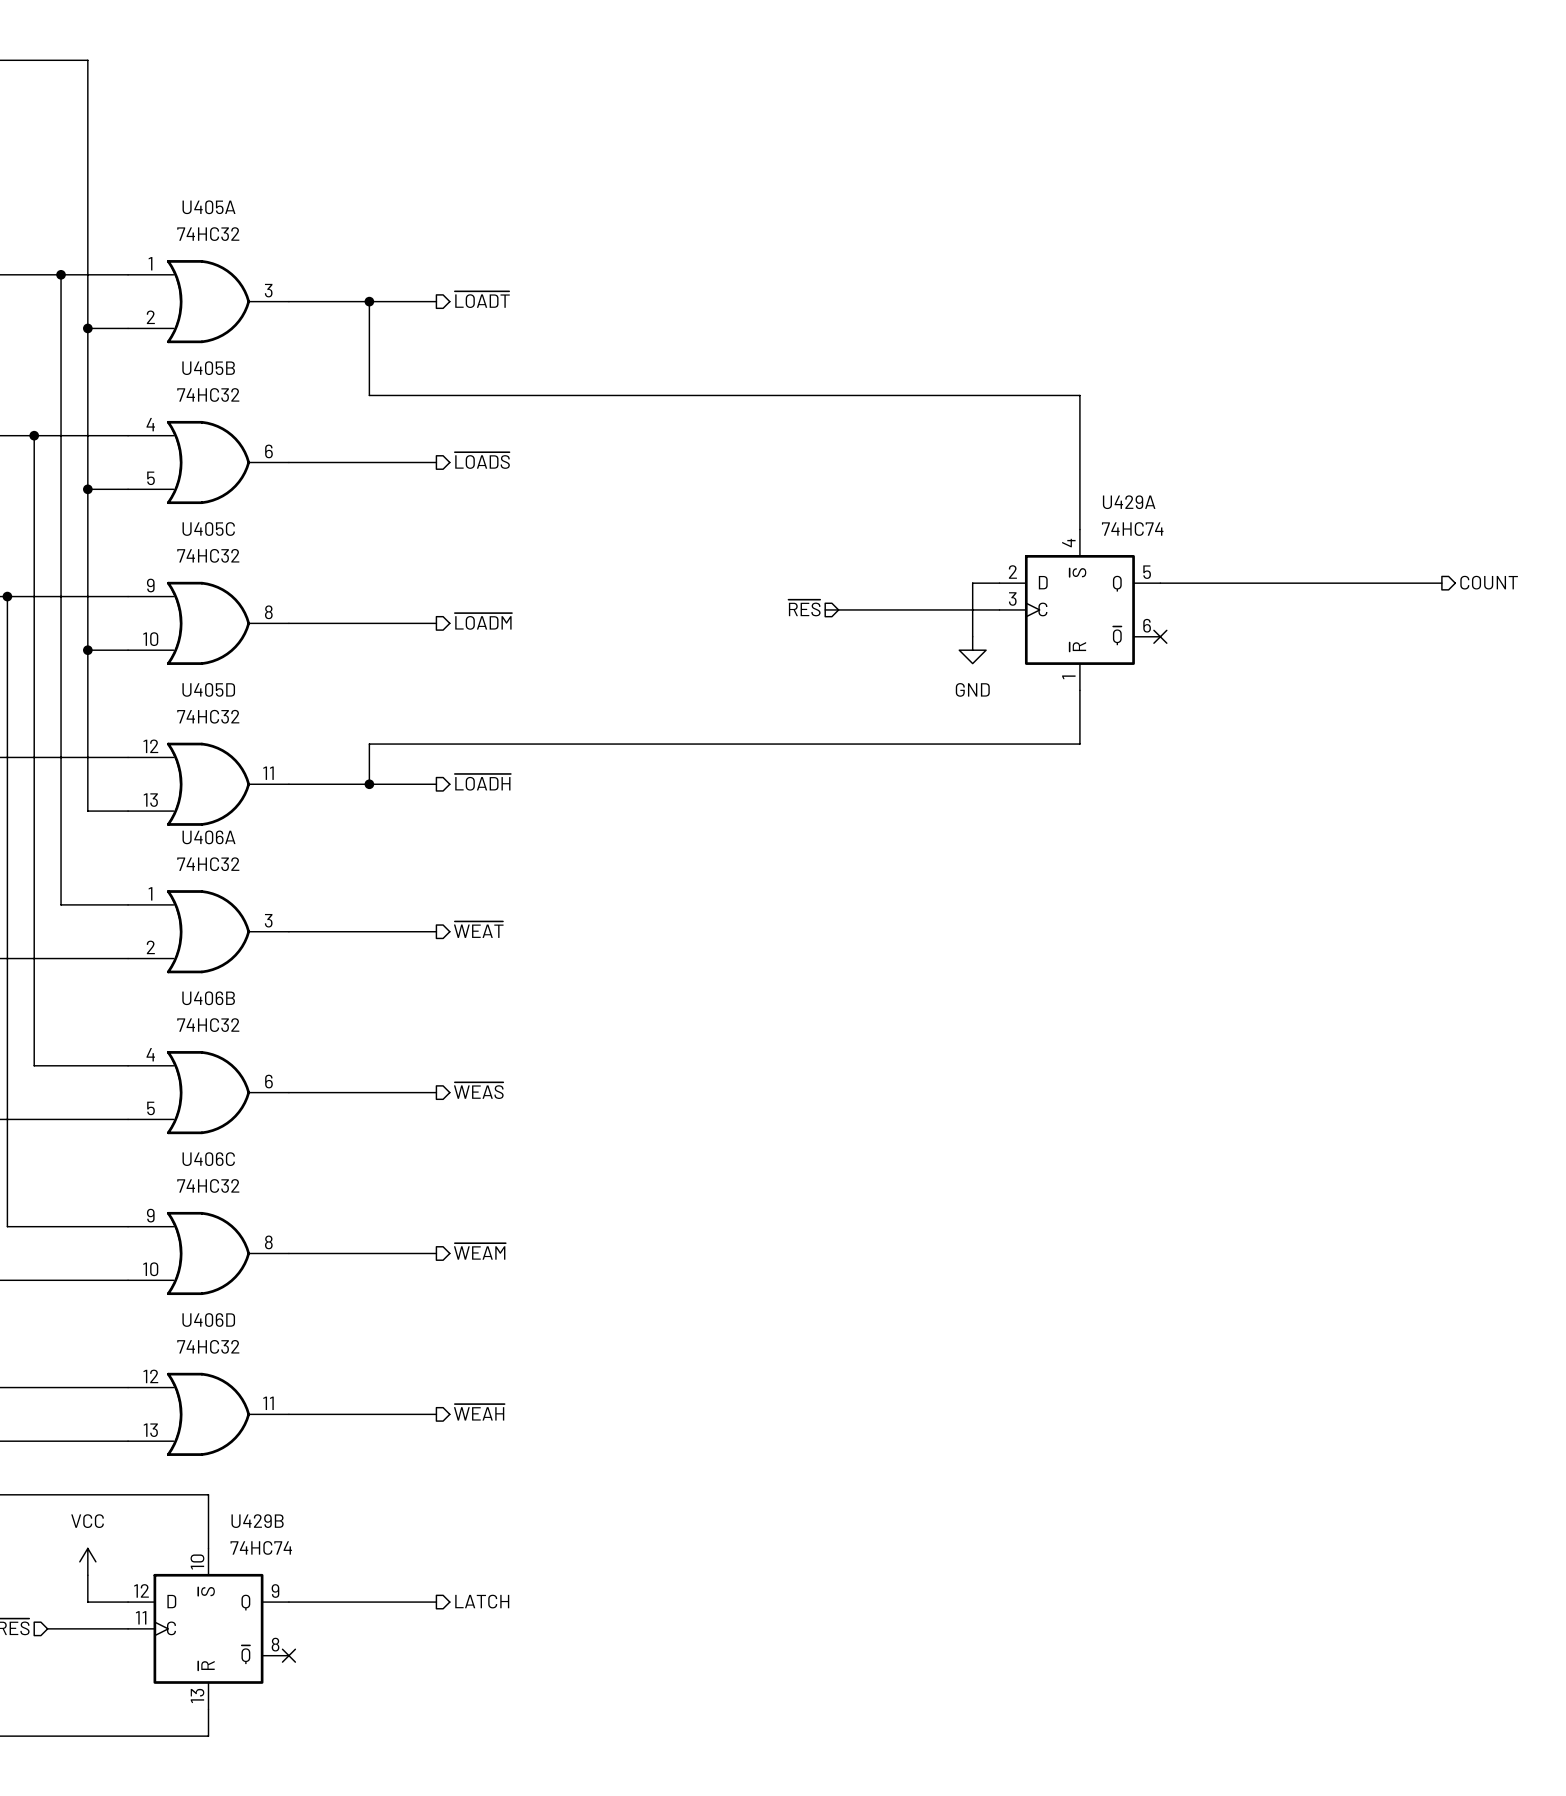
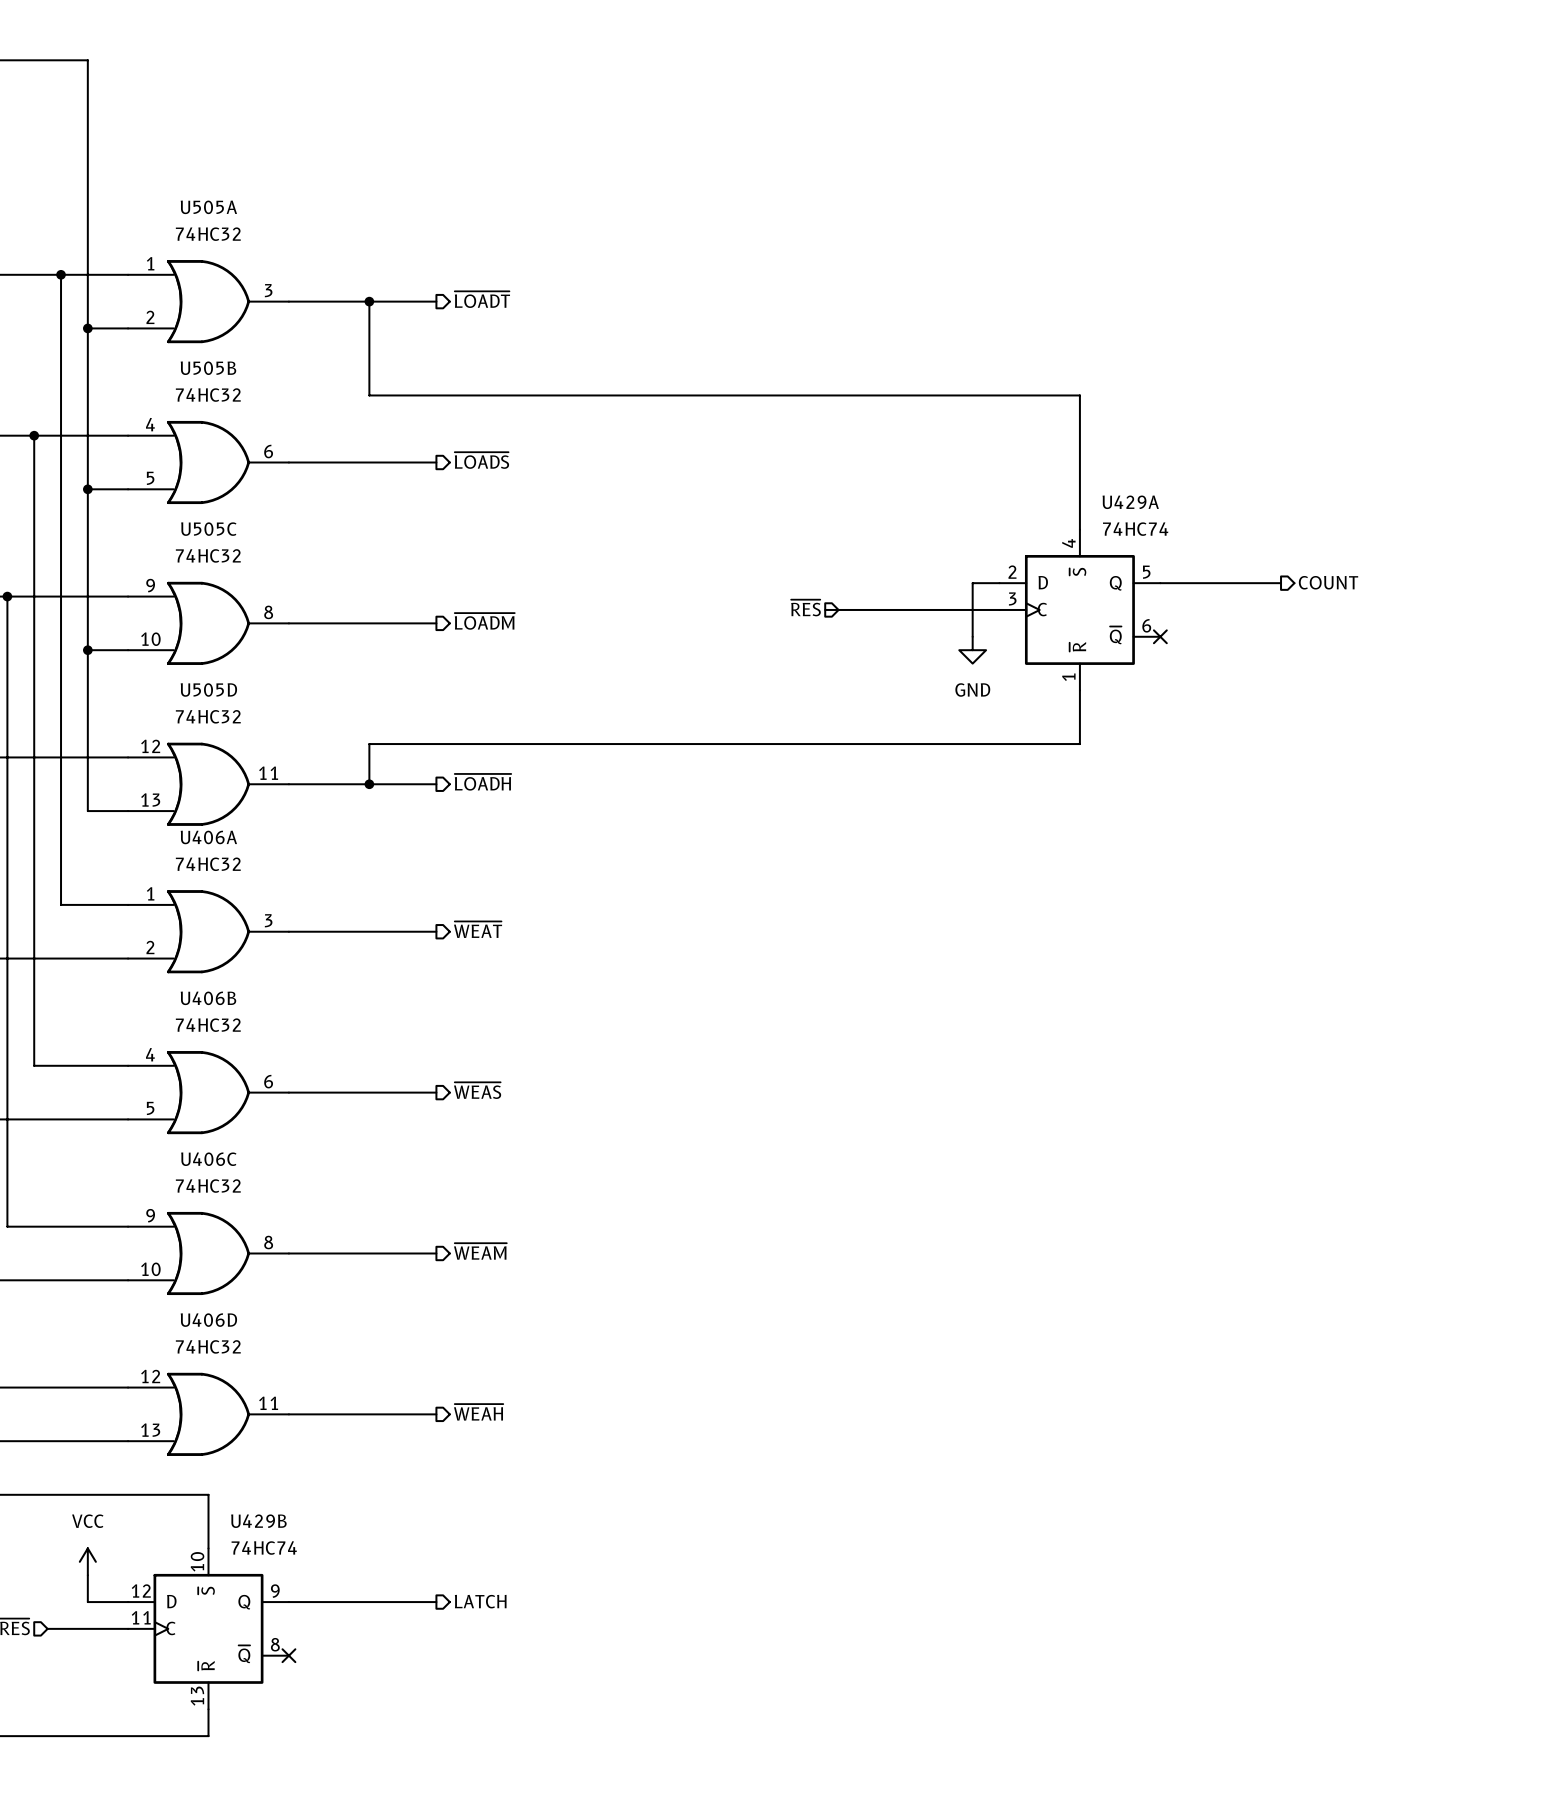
U405A name: U405A (208, 207) -> U505A (208, 207)
U405B name: U405B (208, 368) -> U505B (208, 368)
U405C name: U405C (208, 529) -> U505C (208, 529)
hierarchical label position: COUNT (1489, 582) -> COUNT (1328, 582)
wire: (1281, 583) (1441, 583) -> none
U405D name: U405D (208, 689) -> U505D (208, 689)

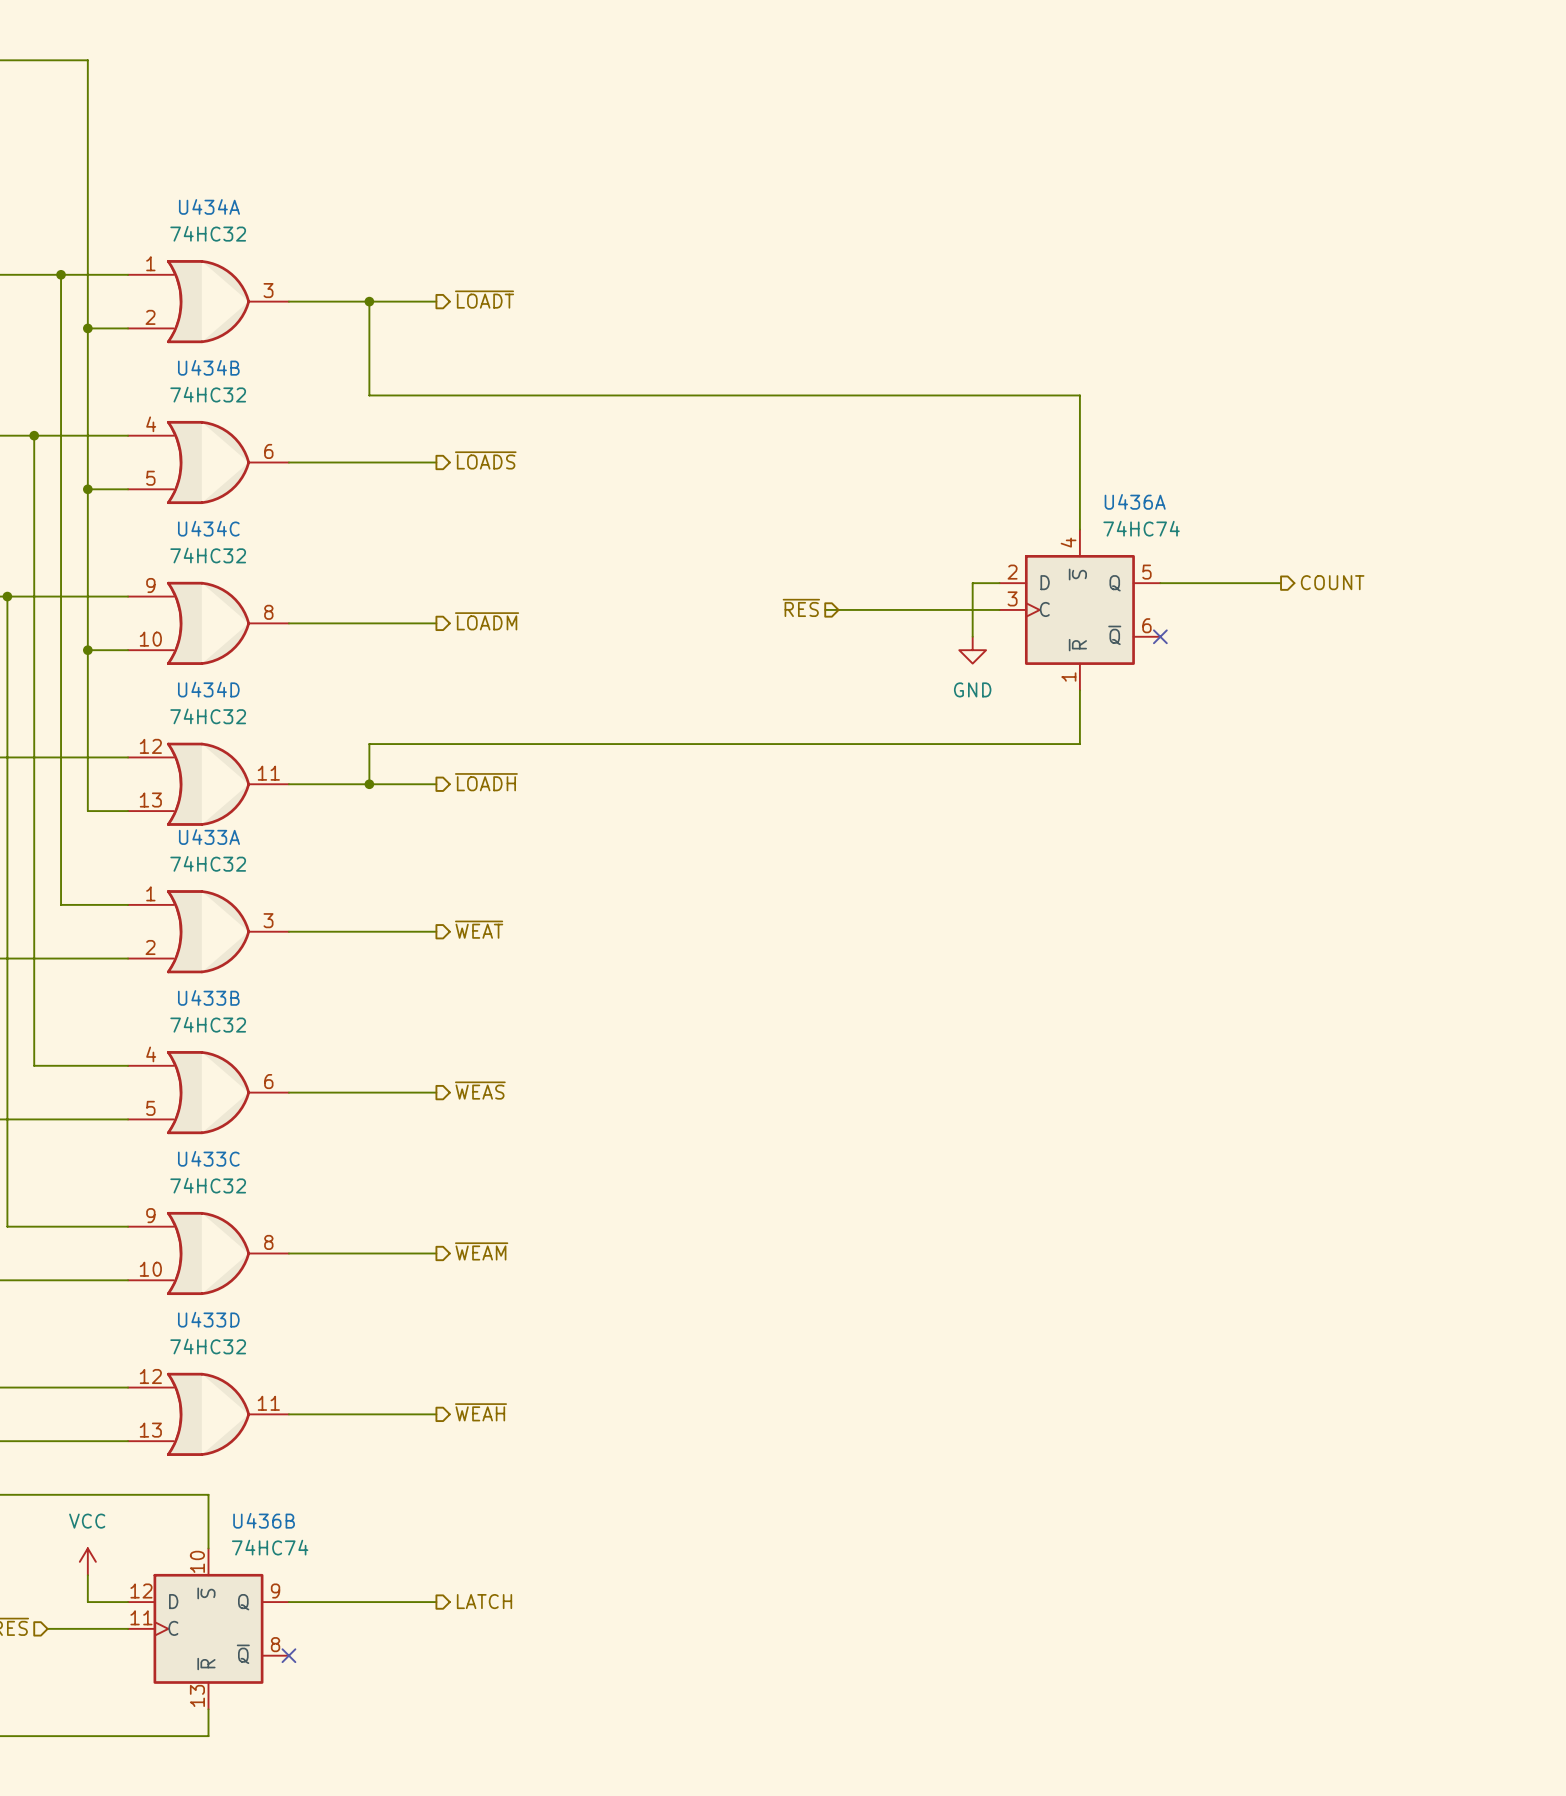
U505A name: U505A (208, 207) -> U434A (209, 206)
U505B name: U505B (208, 368) -> U434B (208, 367)
U429A name: U429A (1130, 502) -> U436A (1135, 501)
U505C name: U505C (208, 529) -> U434C (208, 528)
U505D name: U505D (208, 689) -> U434D (208, 689)
U406A name: U406A (208, 837) -> U433A (209, 837)
U406B name: U406B (208, 998) -> U433B (208, 997)
U406C name: U406C (208, 1159) -> U433C (208, 1158)
U406D name: U406D (208, 1320) -> U433D (208, 1319)
U429B name: U429B (258, 1521) -> U436B (264, 1520)

